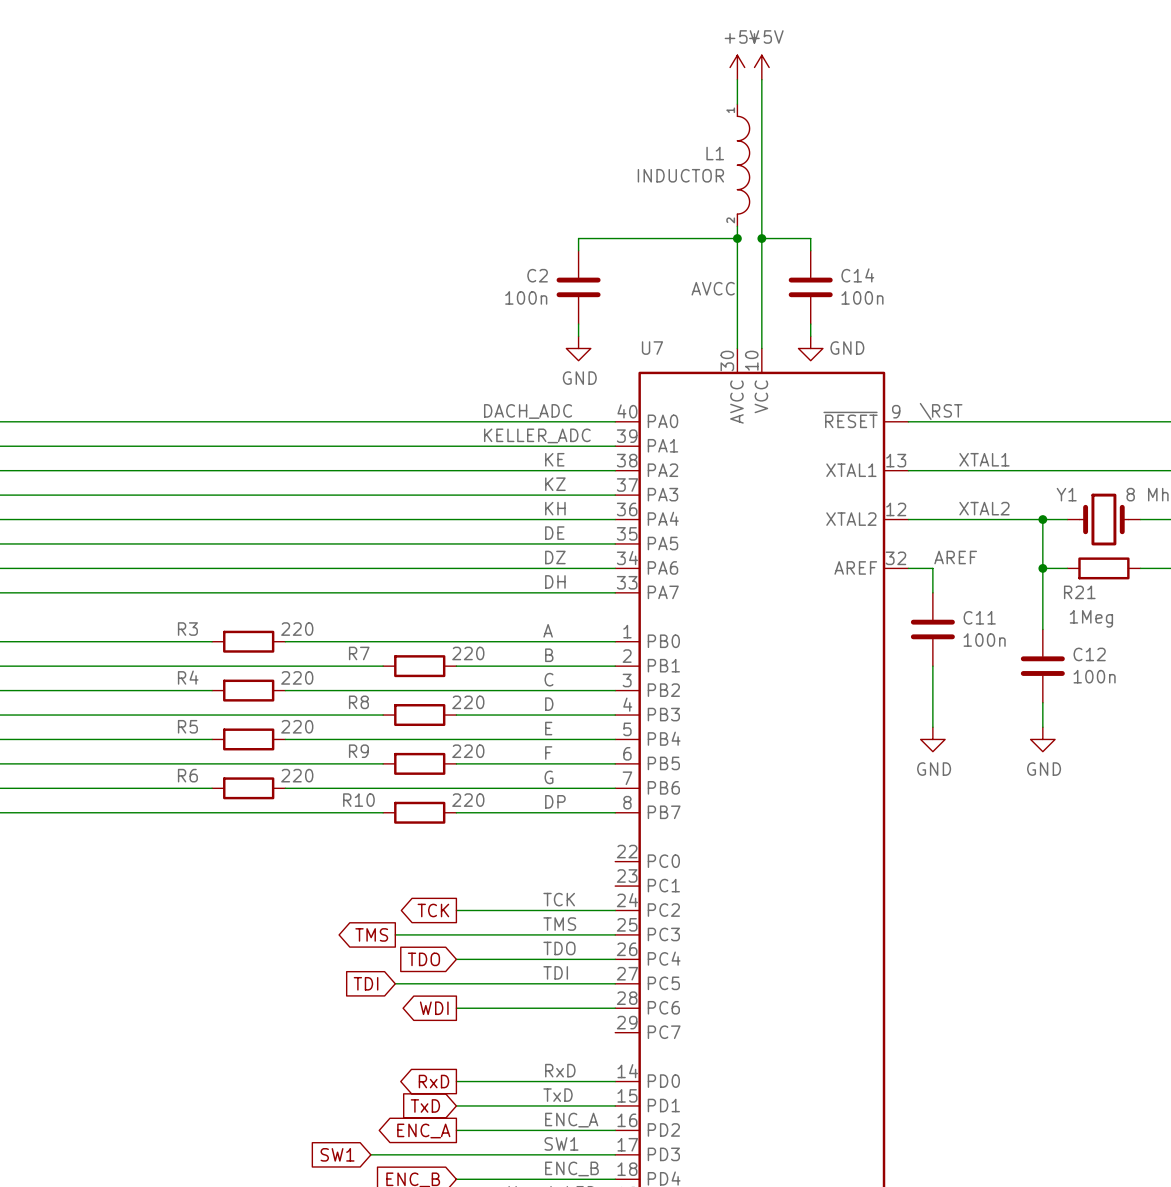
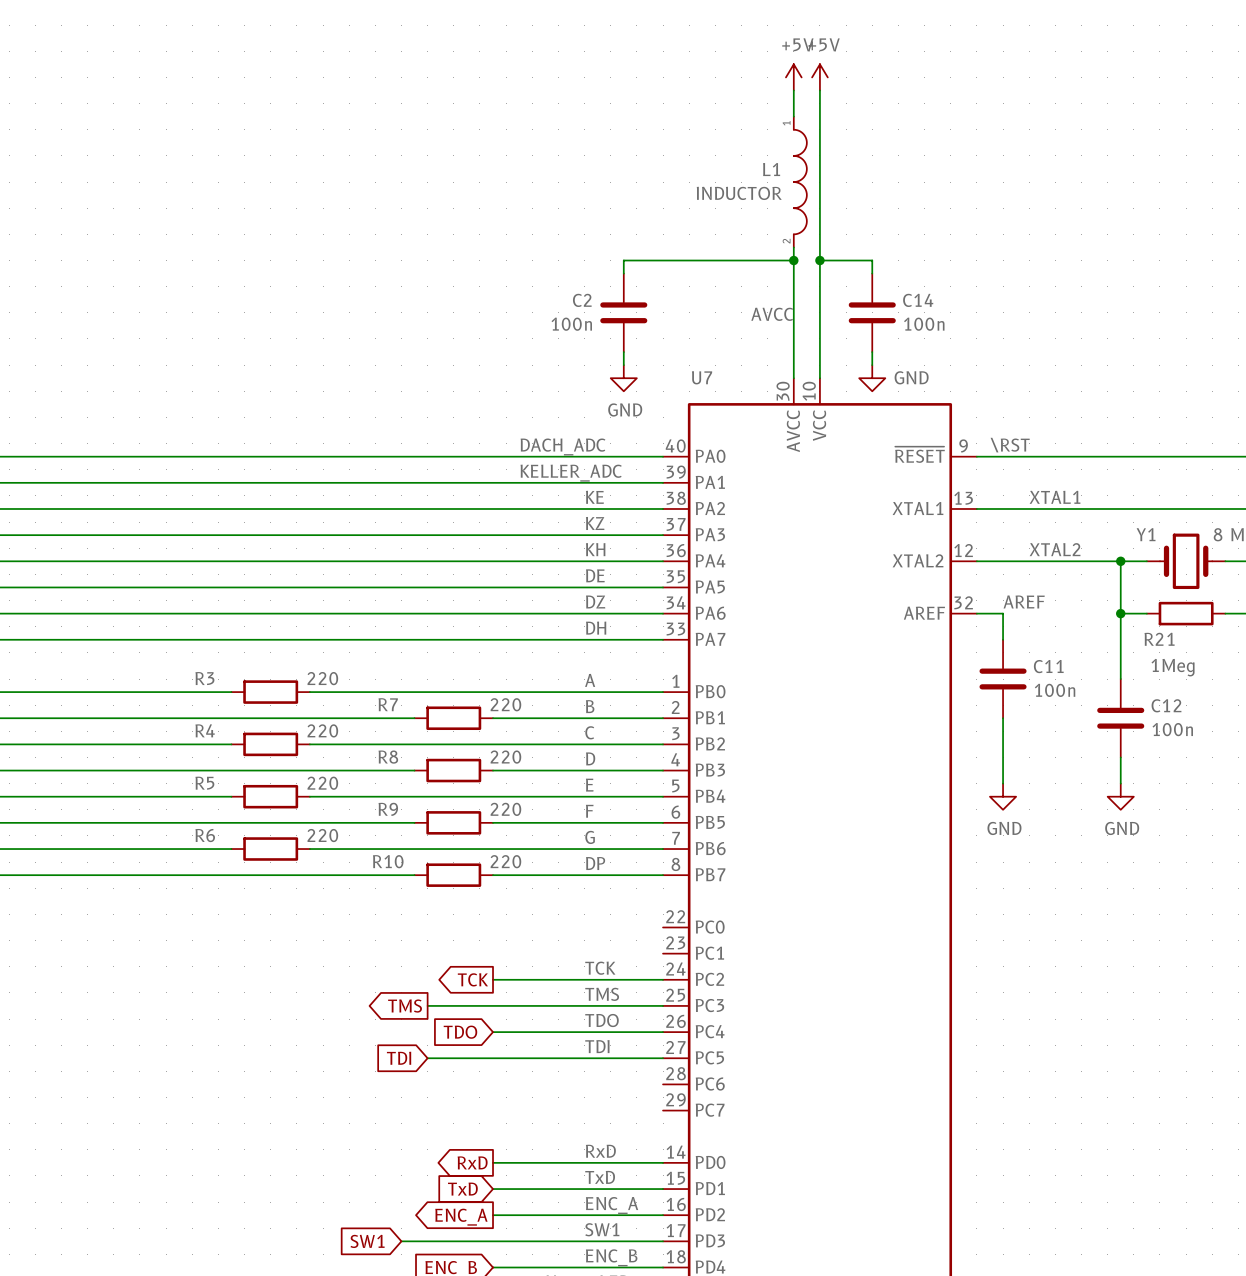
global label: WDI (434, 1008) -> none
wire: (456, 1008) (615, 1008) -> none

